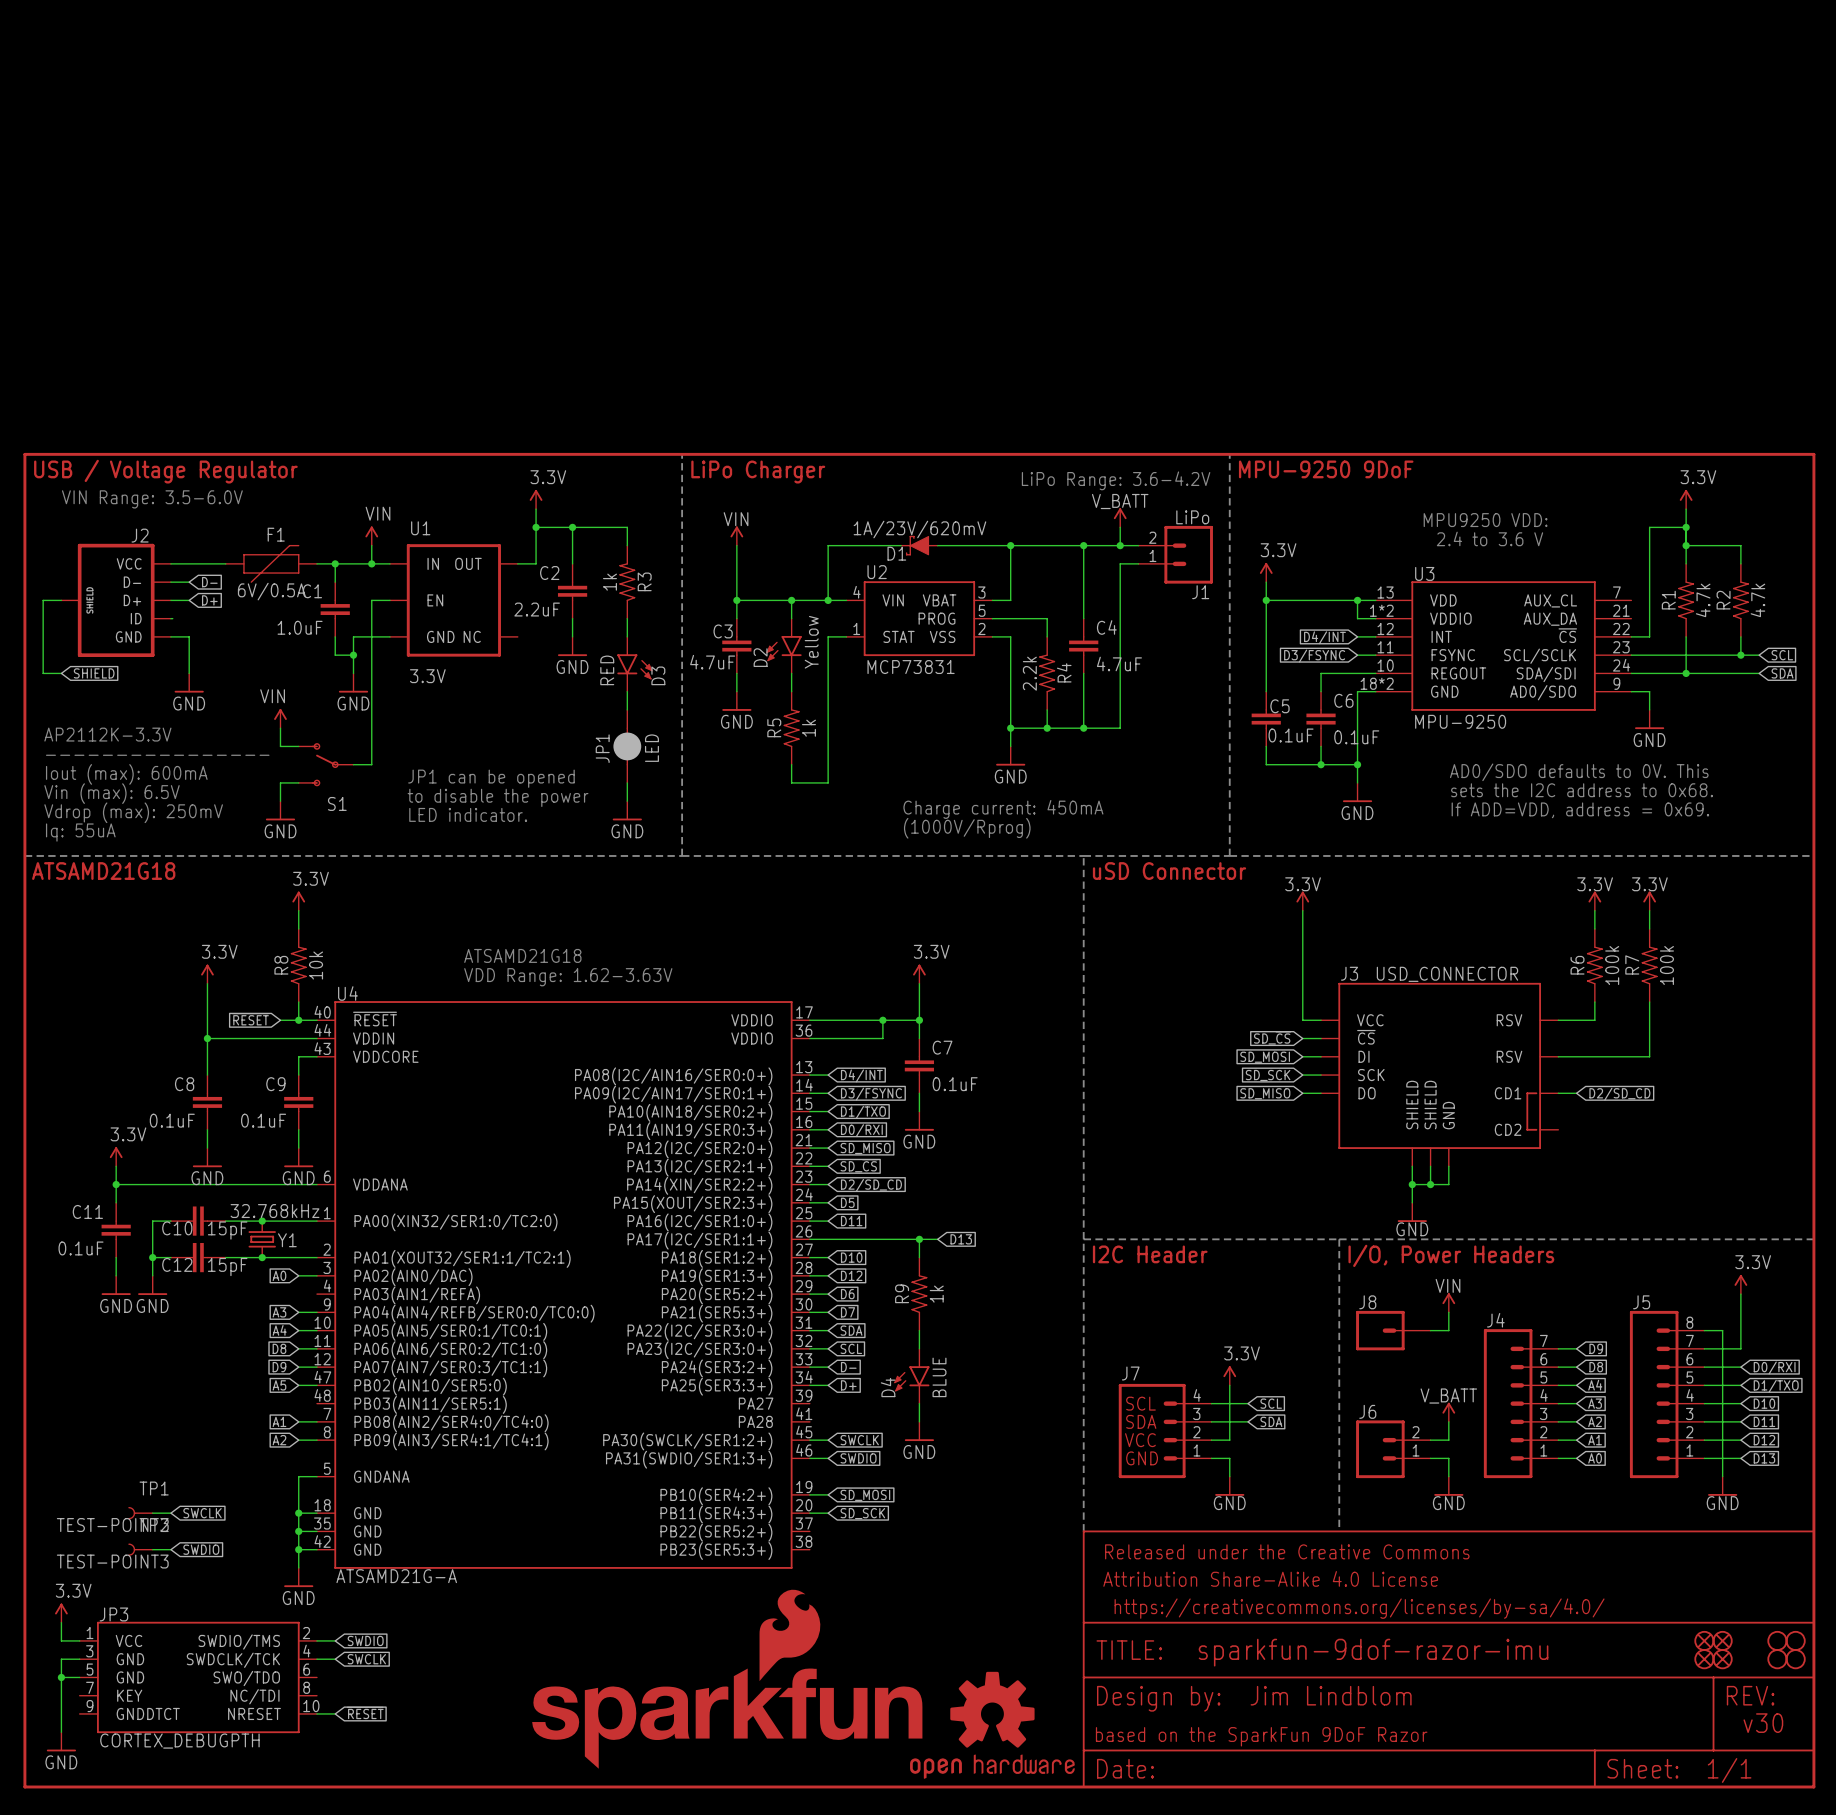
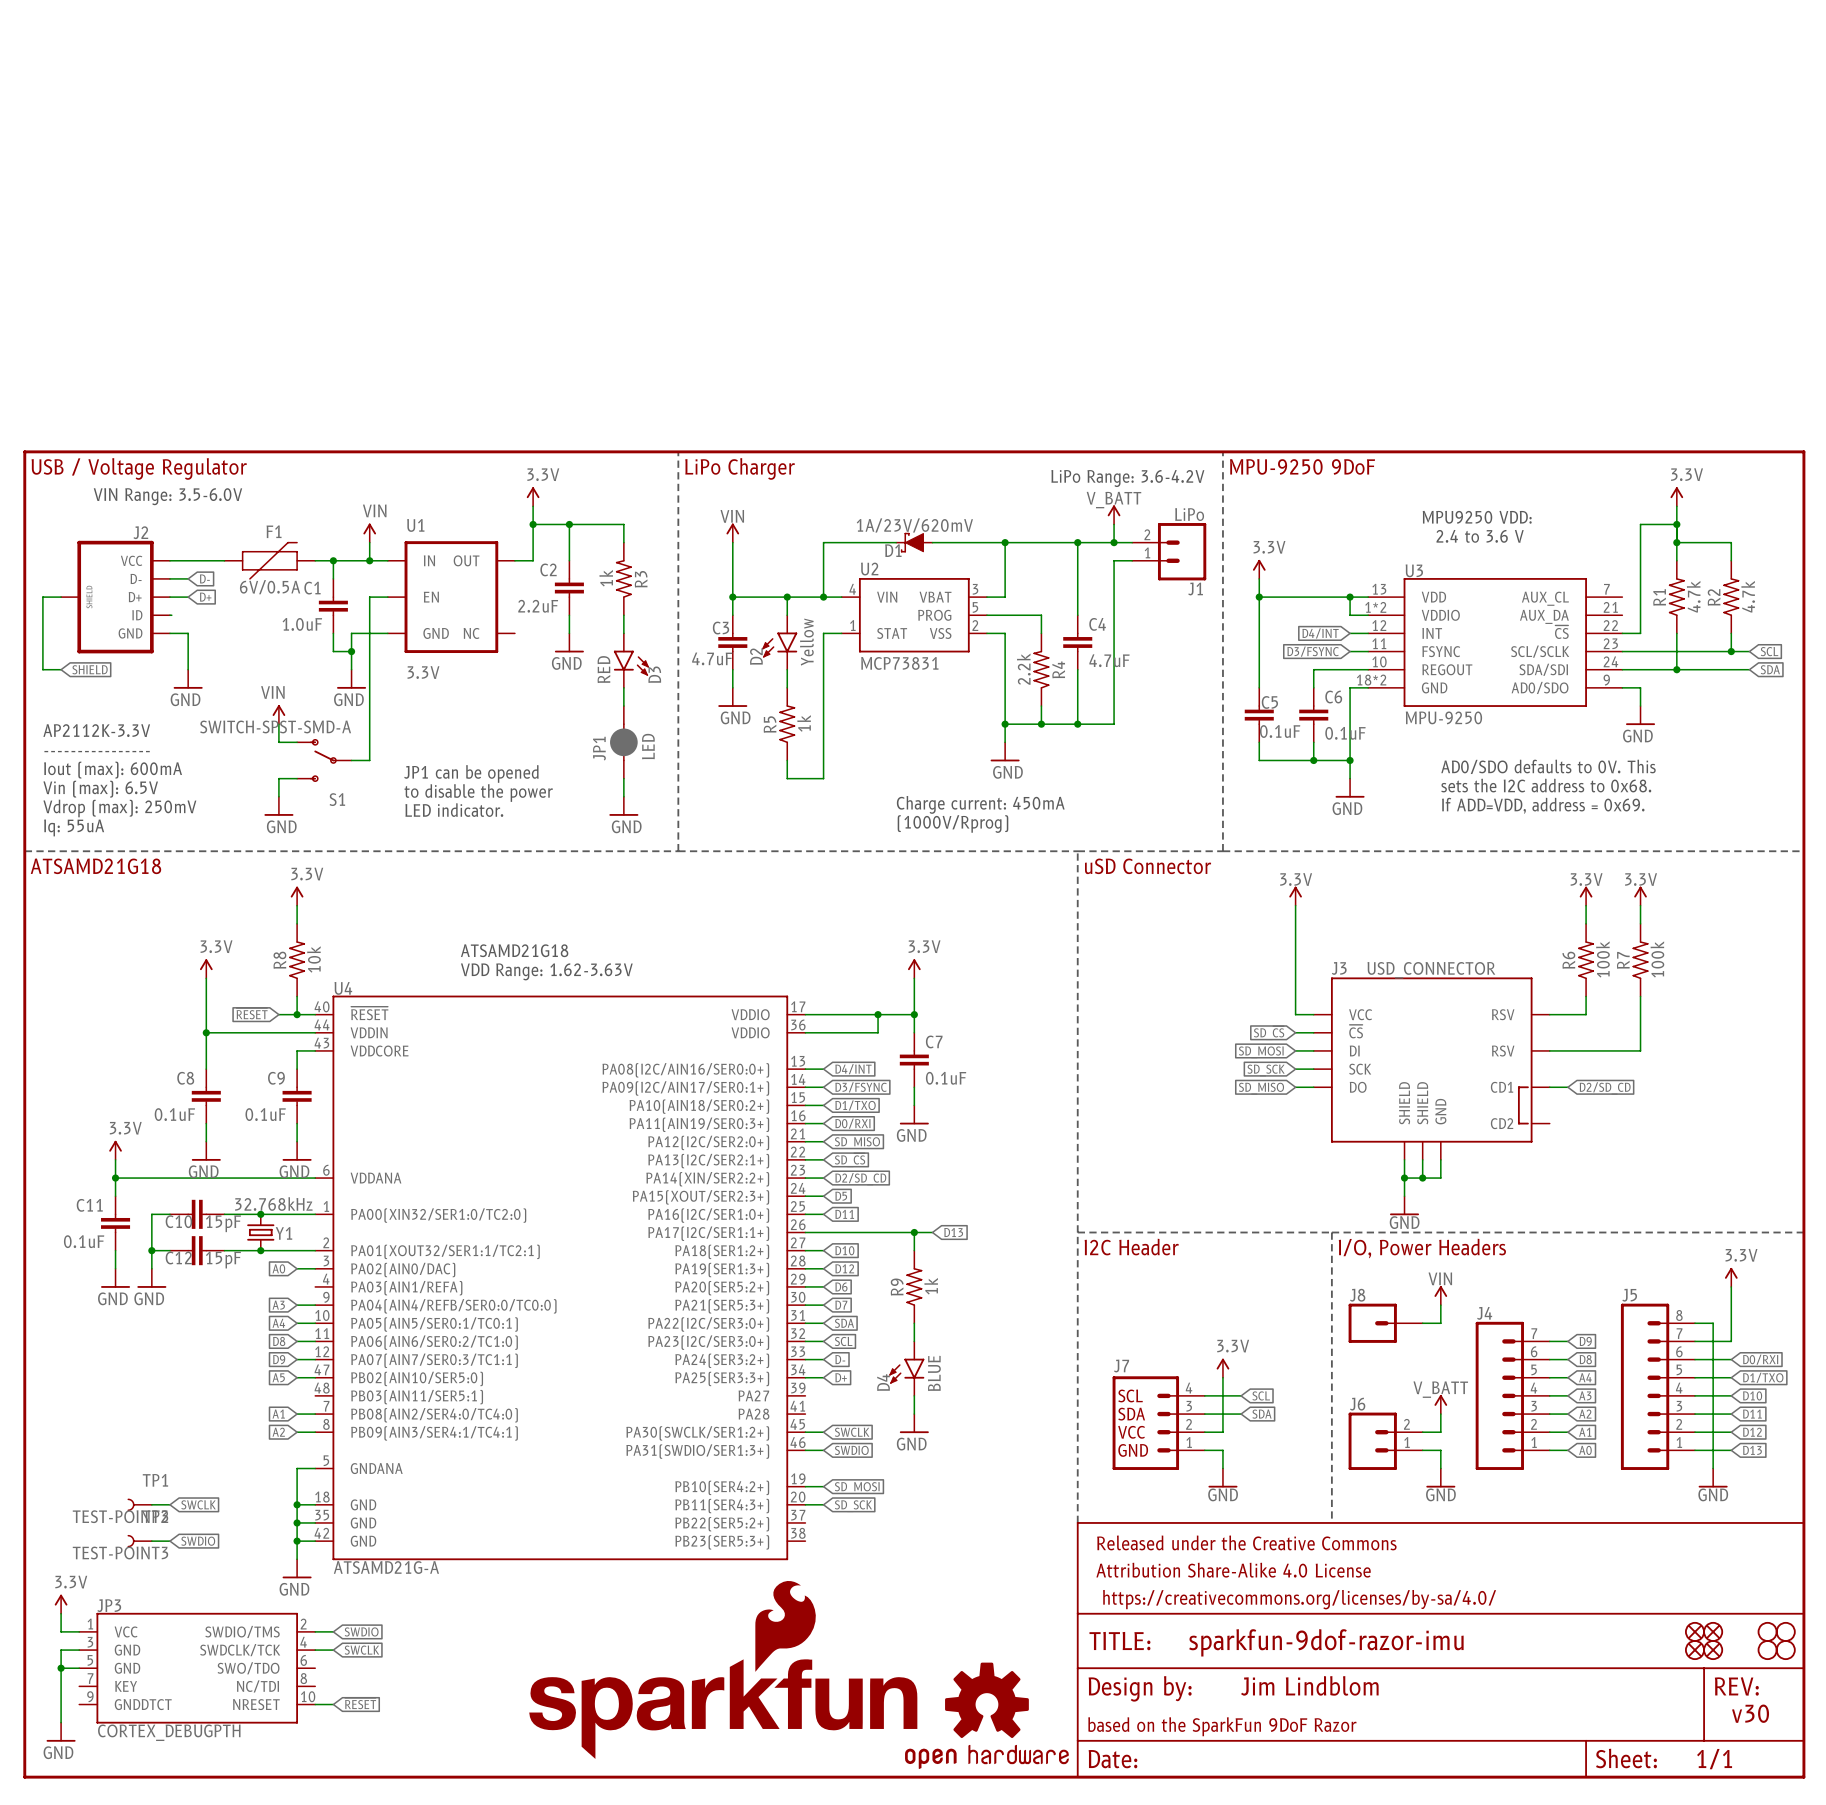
S1 value: none -> SWITCH-SPST-SMD-A (275, 726)

